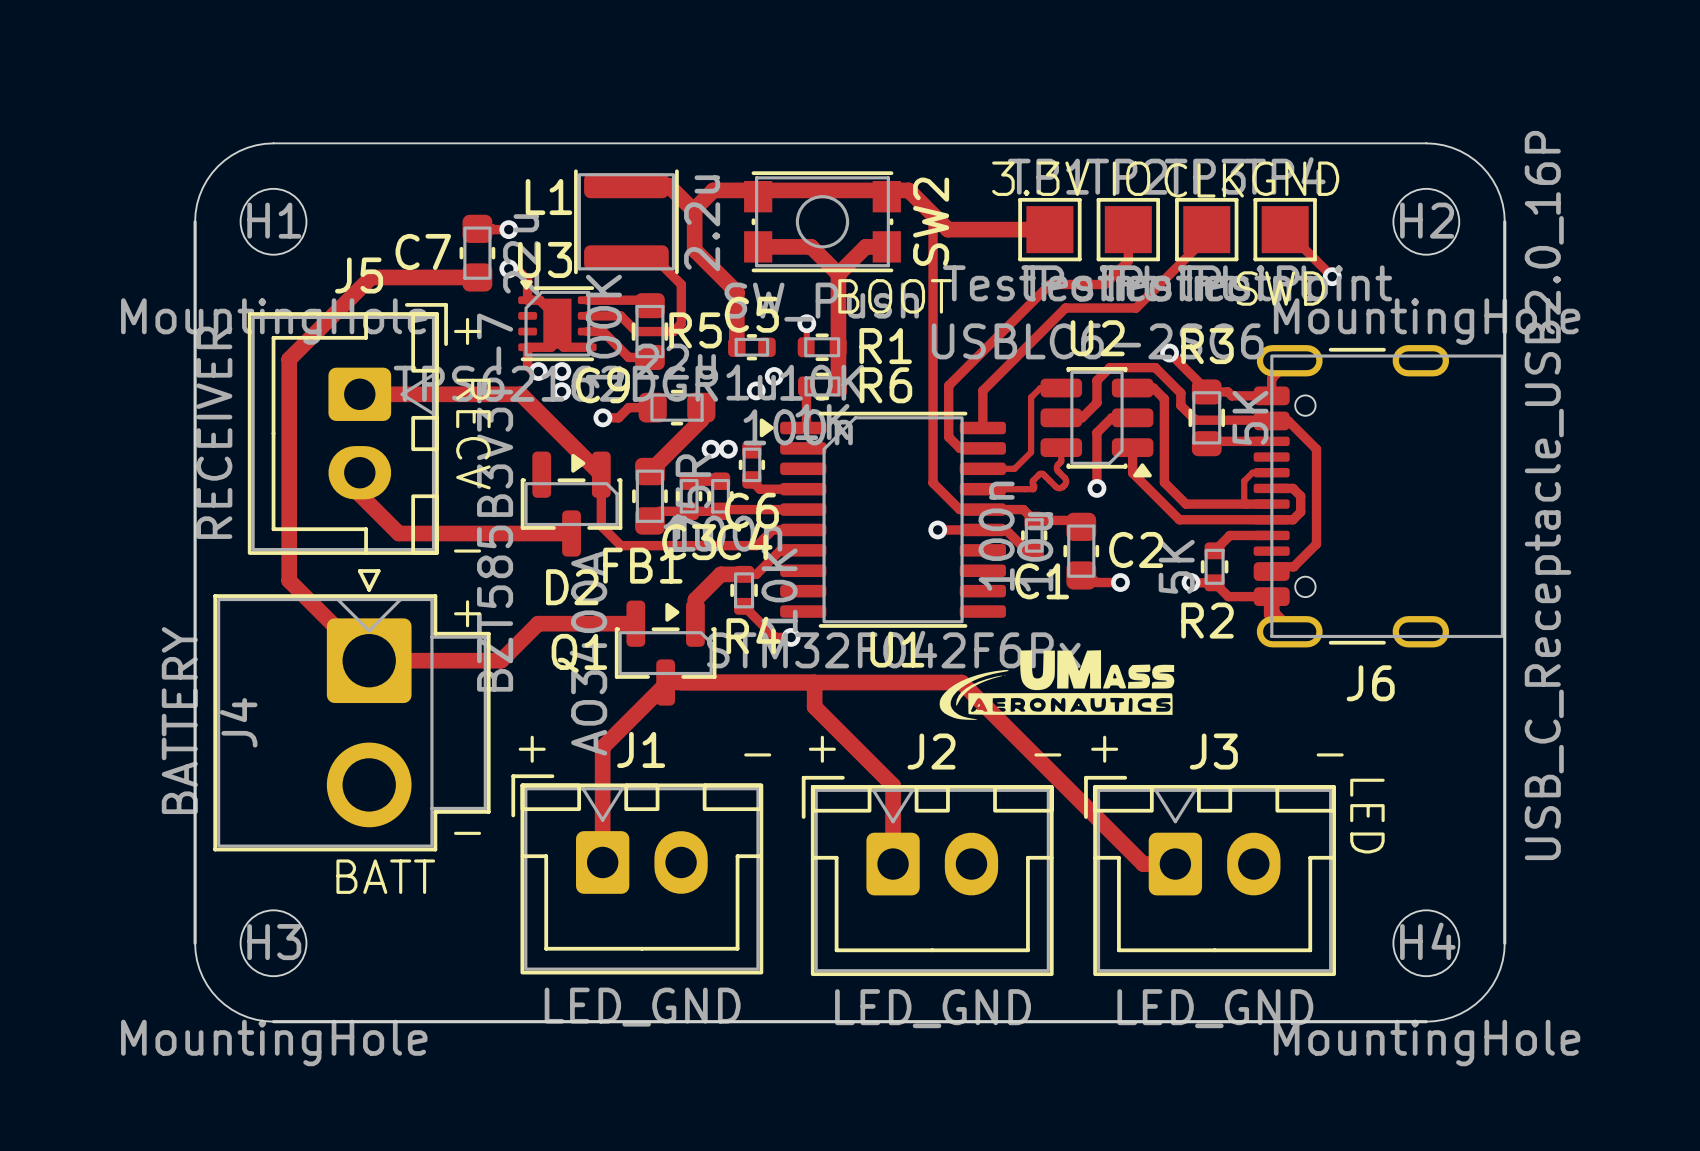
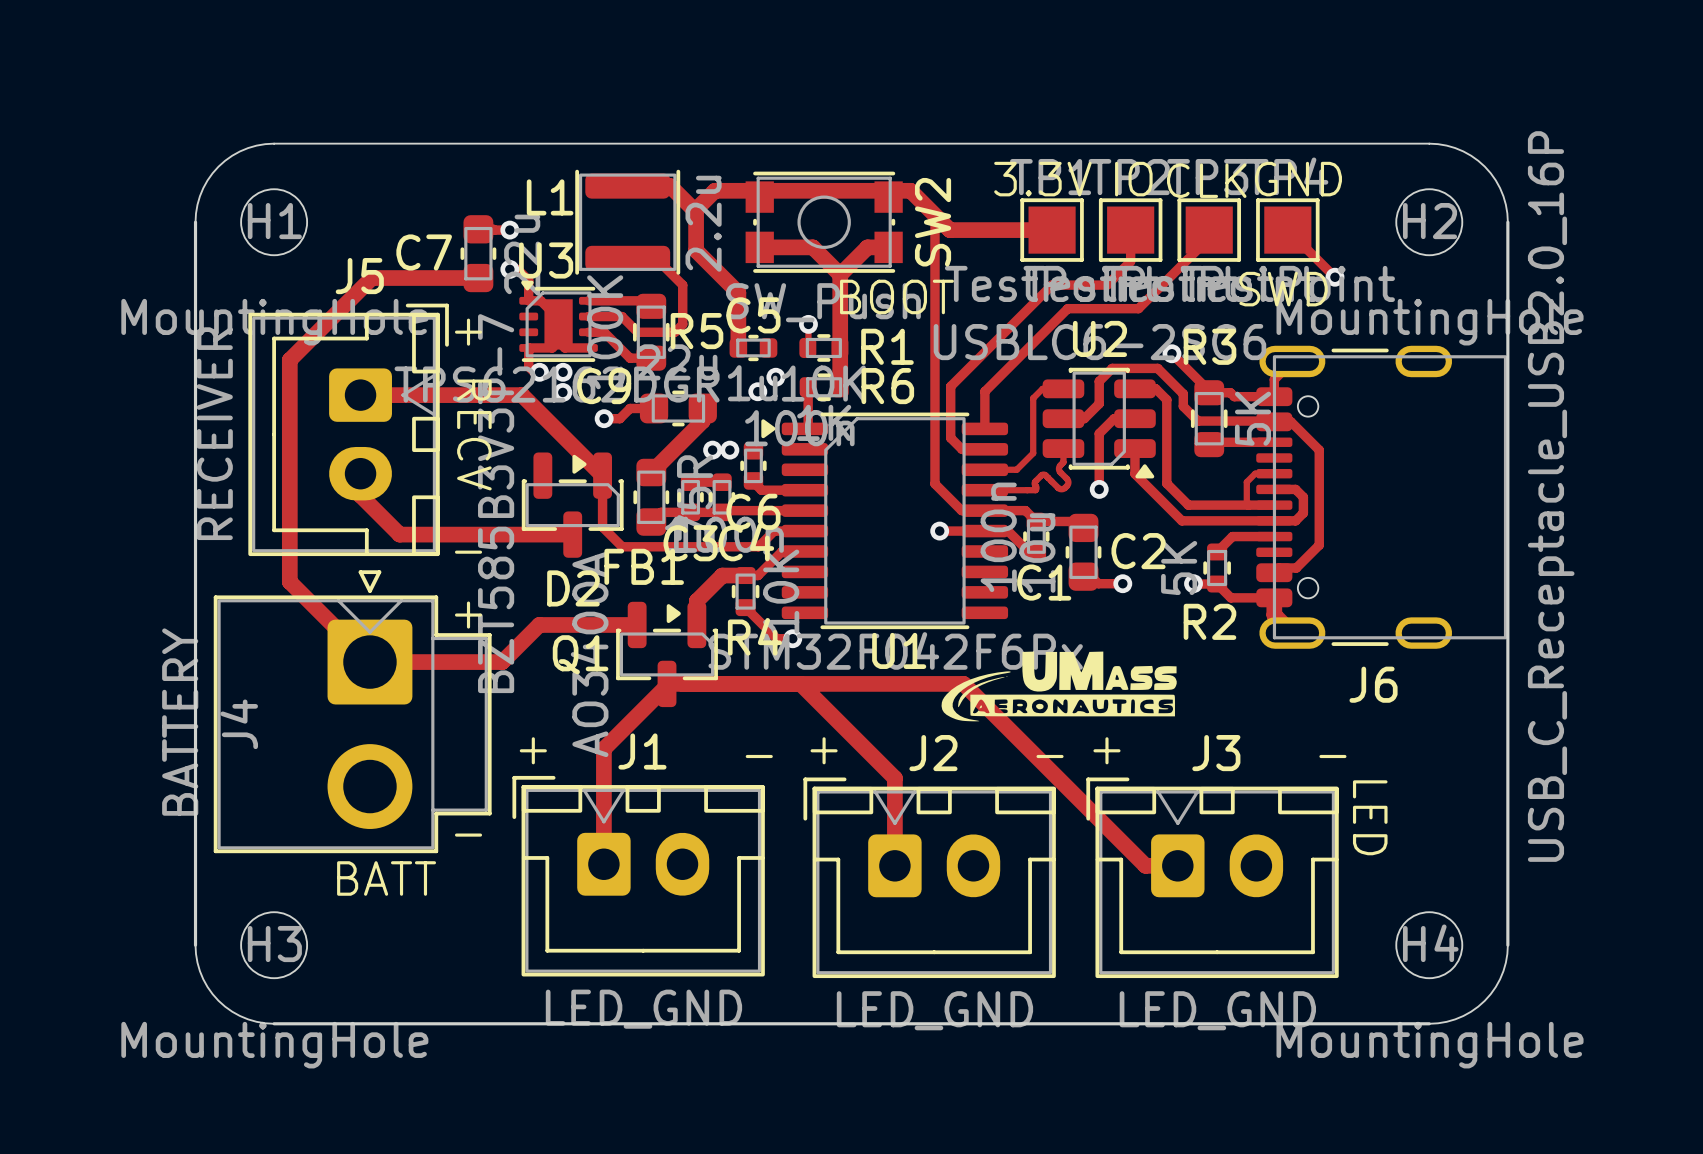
track: (814, 682) (814, 707) (893, 785) -> (800, 683) (894, 778) (894, 787)

